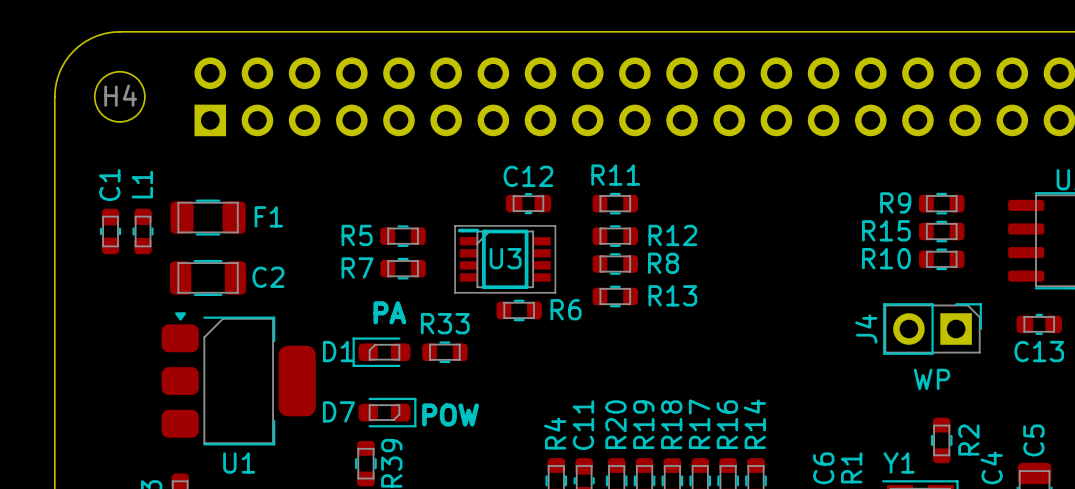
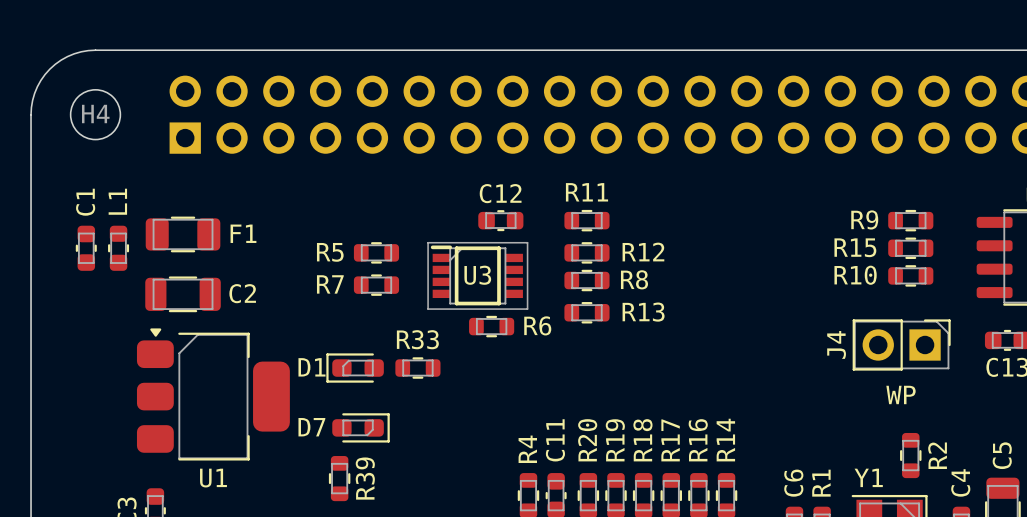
text: PA (389, 312) -> none
text: POW (450, 414) -> none

